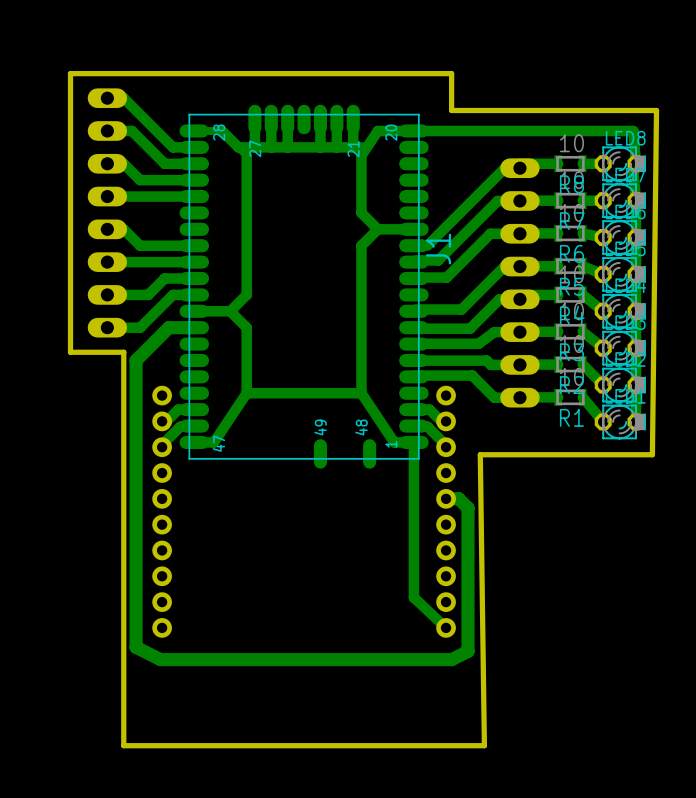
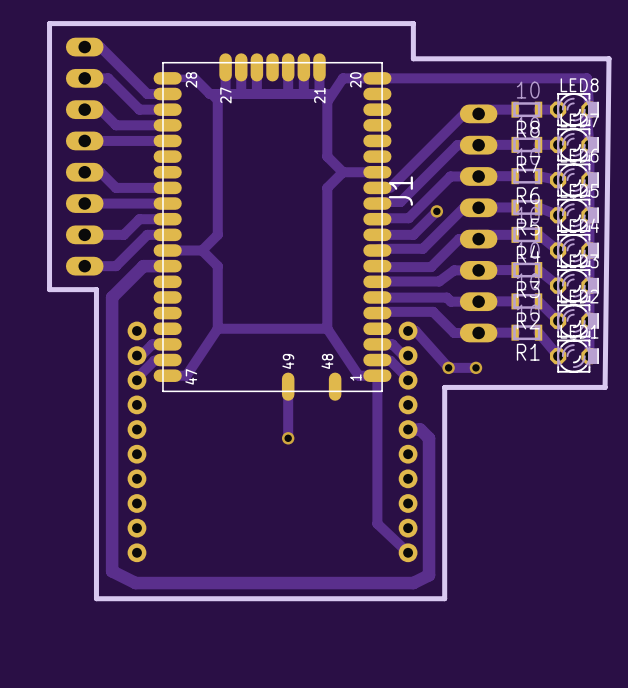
track: none -> (436, 211) (413, 234) (377, 234)
via: none -> (436, 211)
board edge: (119, 352) (123, 352) (123, 745) (484, 745) (480, 454) (484, 454) -> (96, 289) (96, 598) (444, 598) (444, 387)
track: none -> (408, 330) (415, 330) (448, 367) (475, 367)
via: none -> (448, 367)
via: none -> (475, 367)
track: none -> (288, 386) (288, 438)
via: none -> (288, 438)

